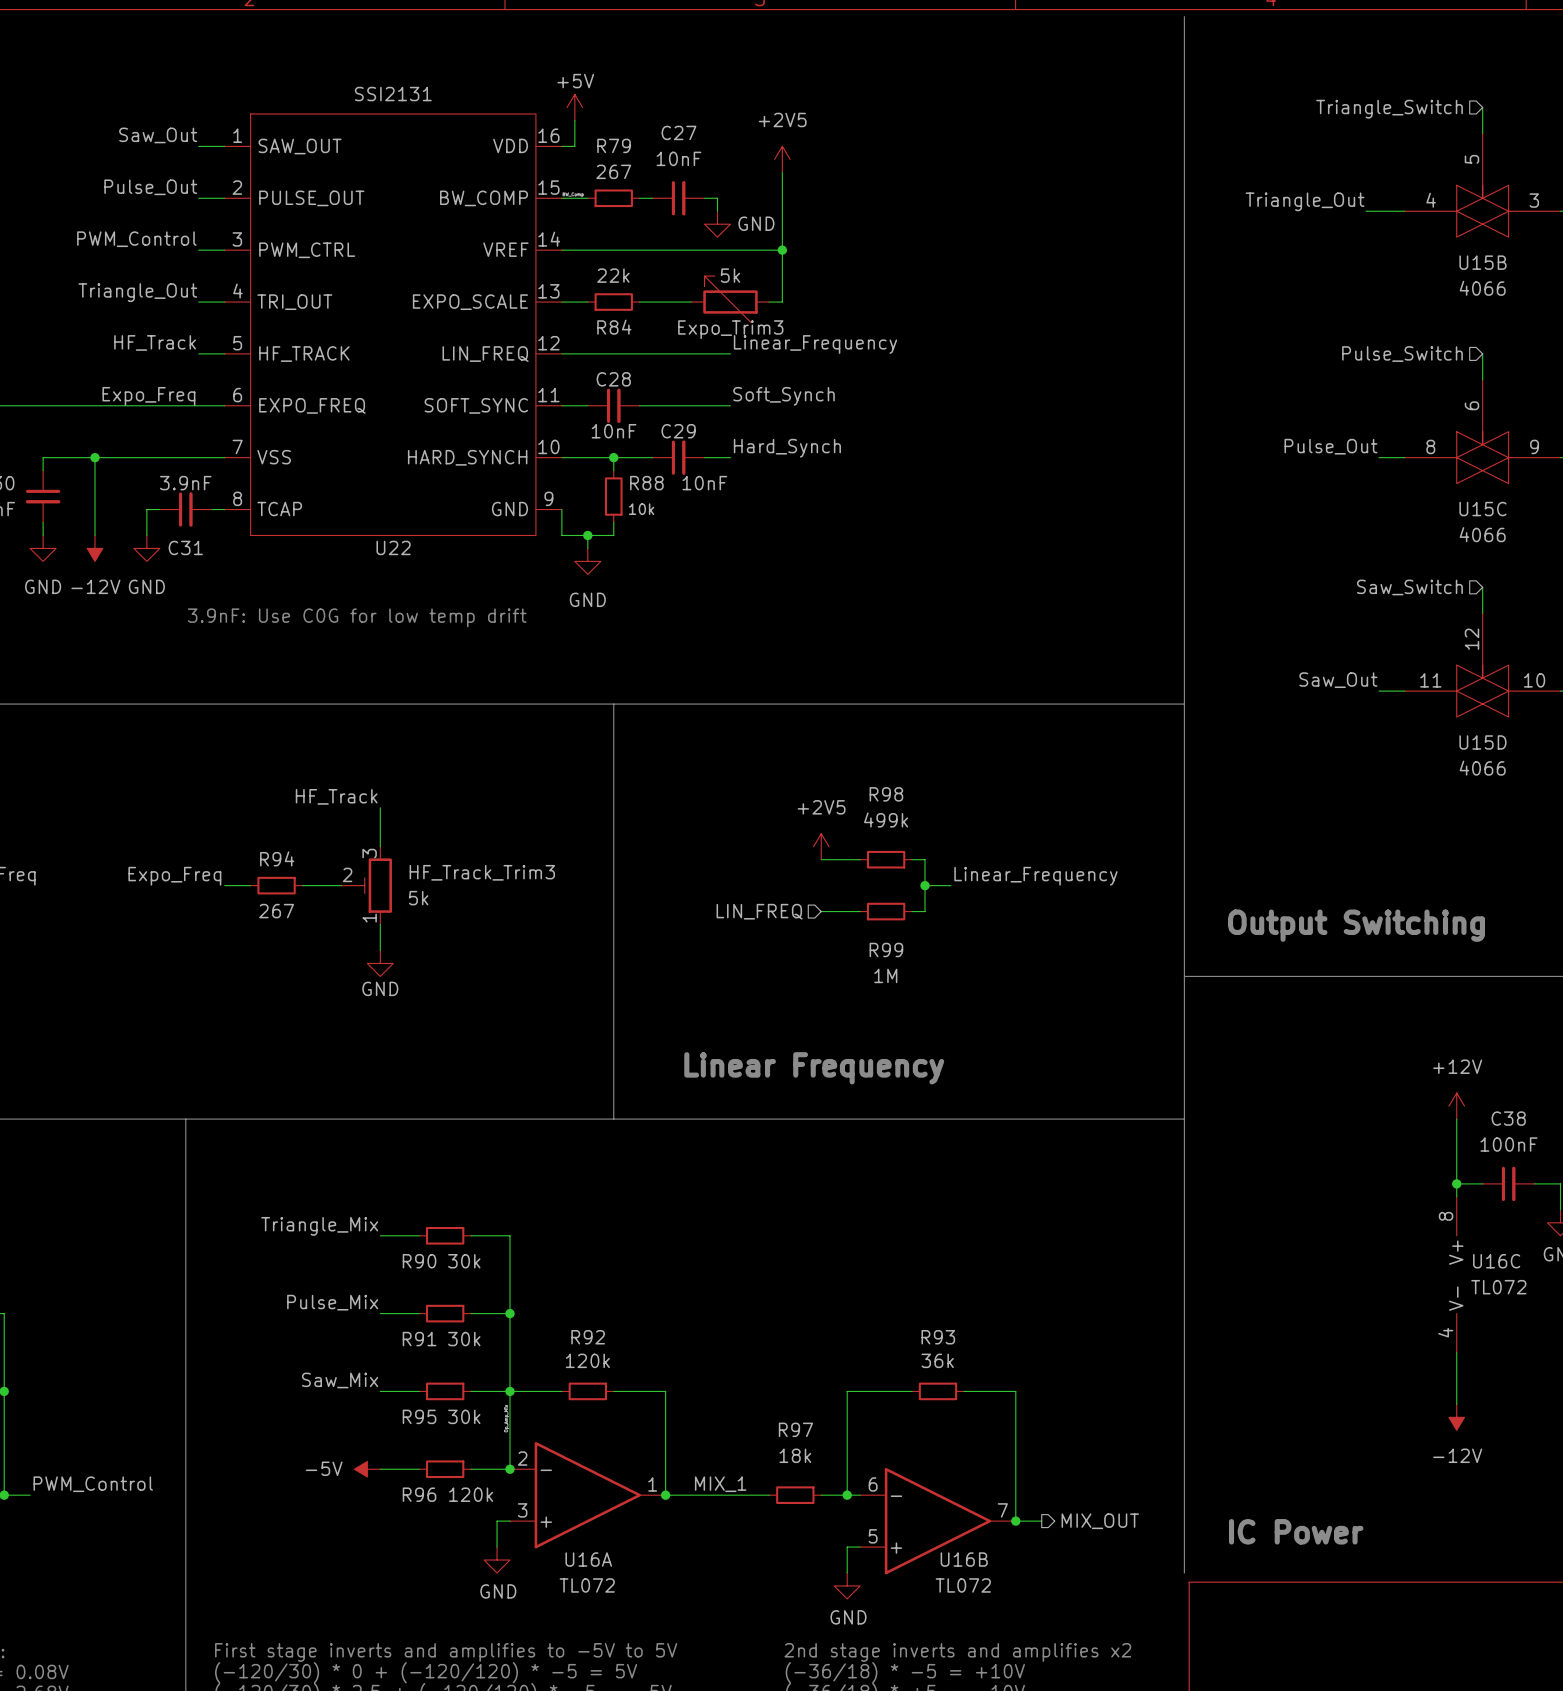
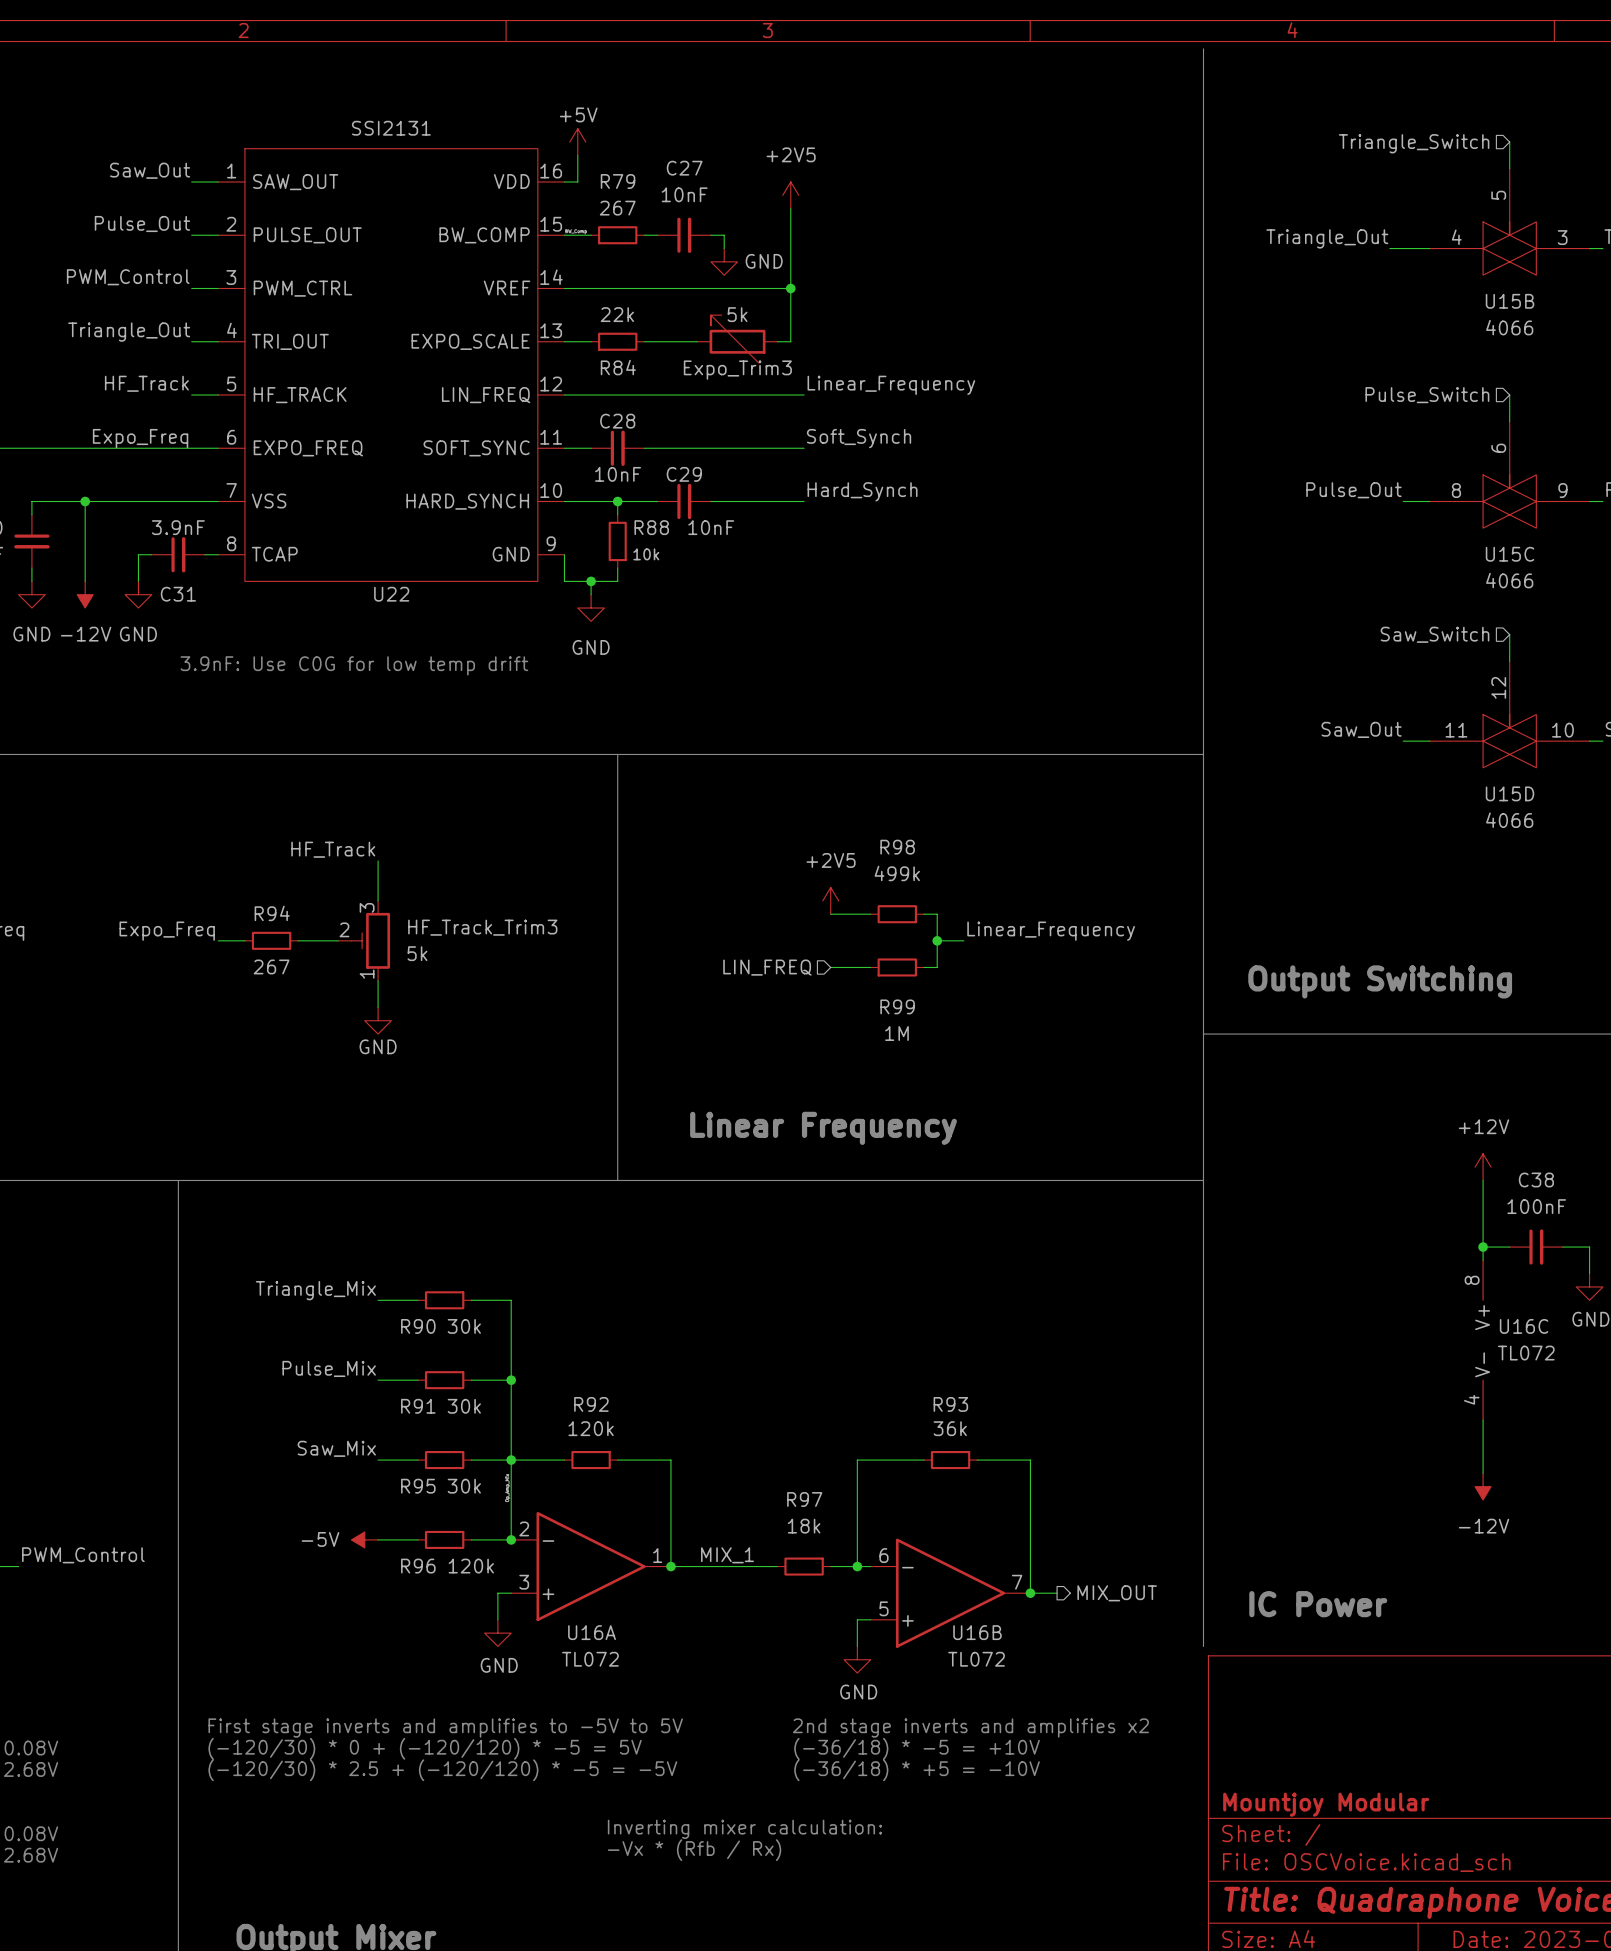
label position: Linear_Frequency (815, 344) -> Linear_Frequency (891, 385)
wire: none -> (737, 395) (804, 395)
label position: Soft_Synch (783, 396) -> Soft_Synch (859, 438)
wire: none -> (737, 448) (804, 448)
label position: Hard_Synch (787, 448) -> Hard_Synch (862, 491)
wire: none -> (737, 501) (804, 501)

